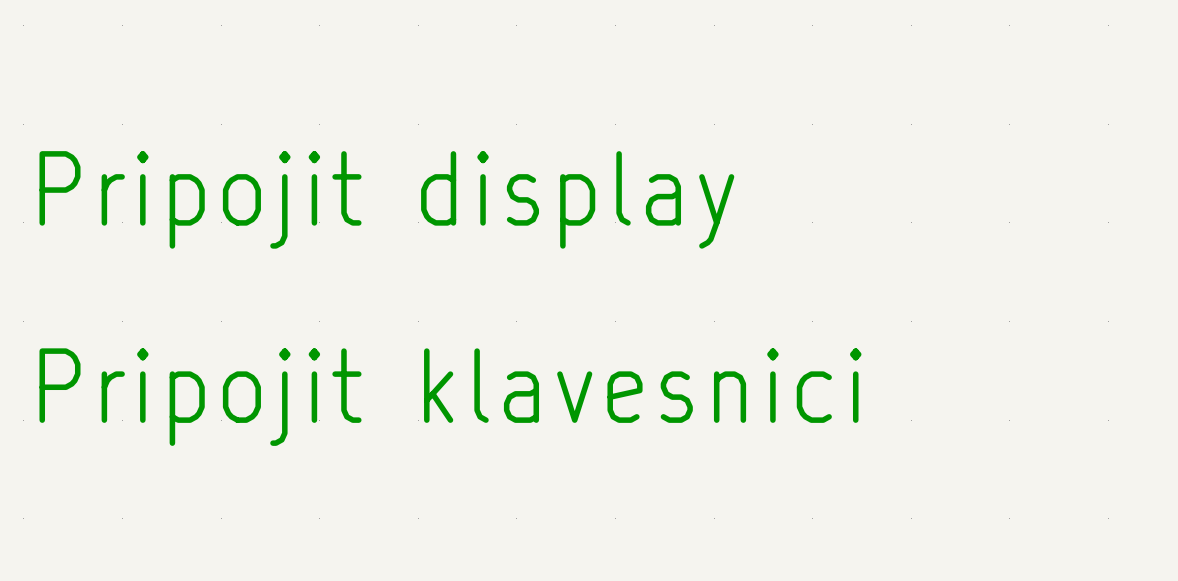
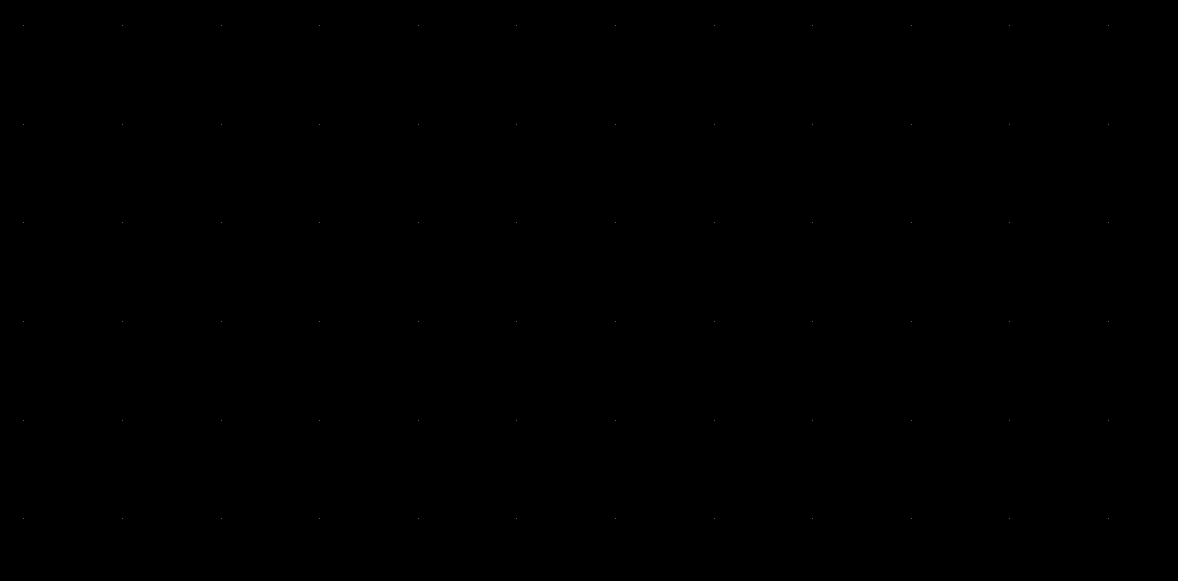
text: Pripojit display (386, 199) -> none
text: Pripojit klavesnici (450, 397) -> none

